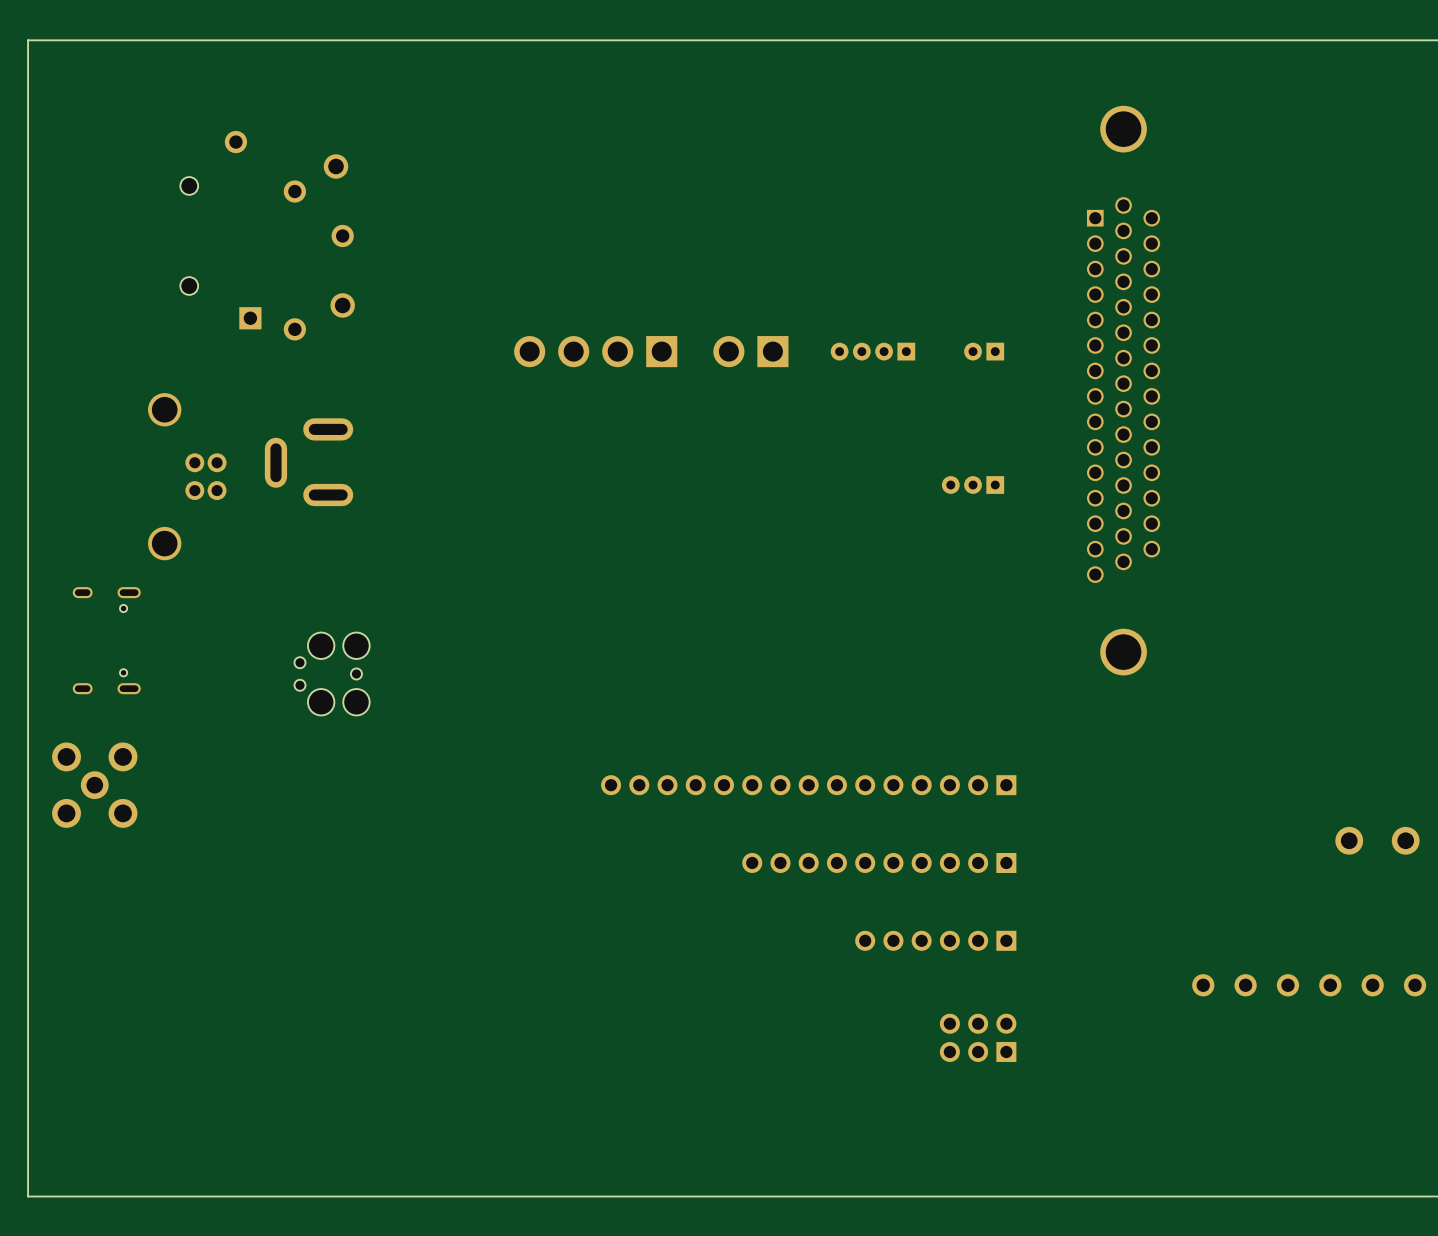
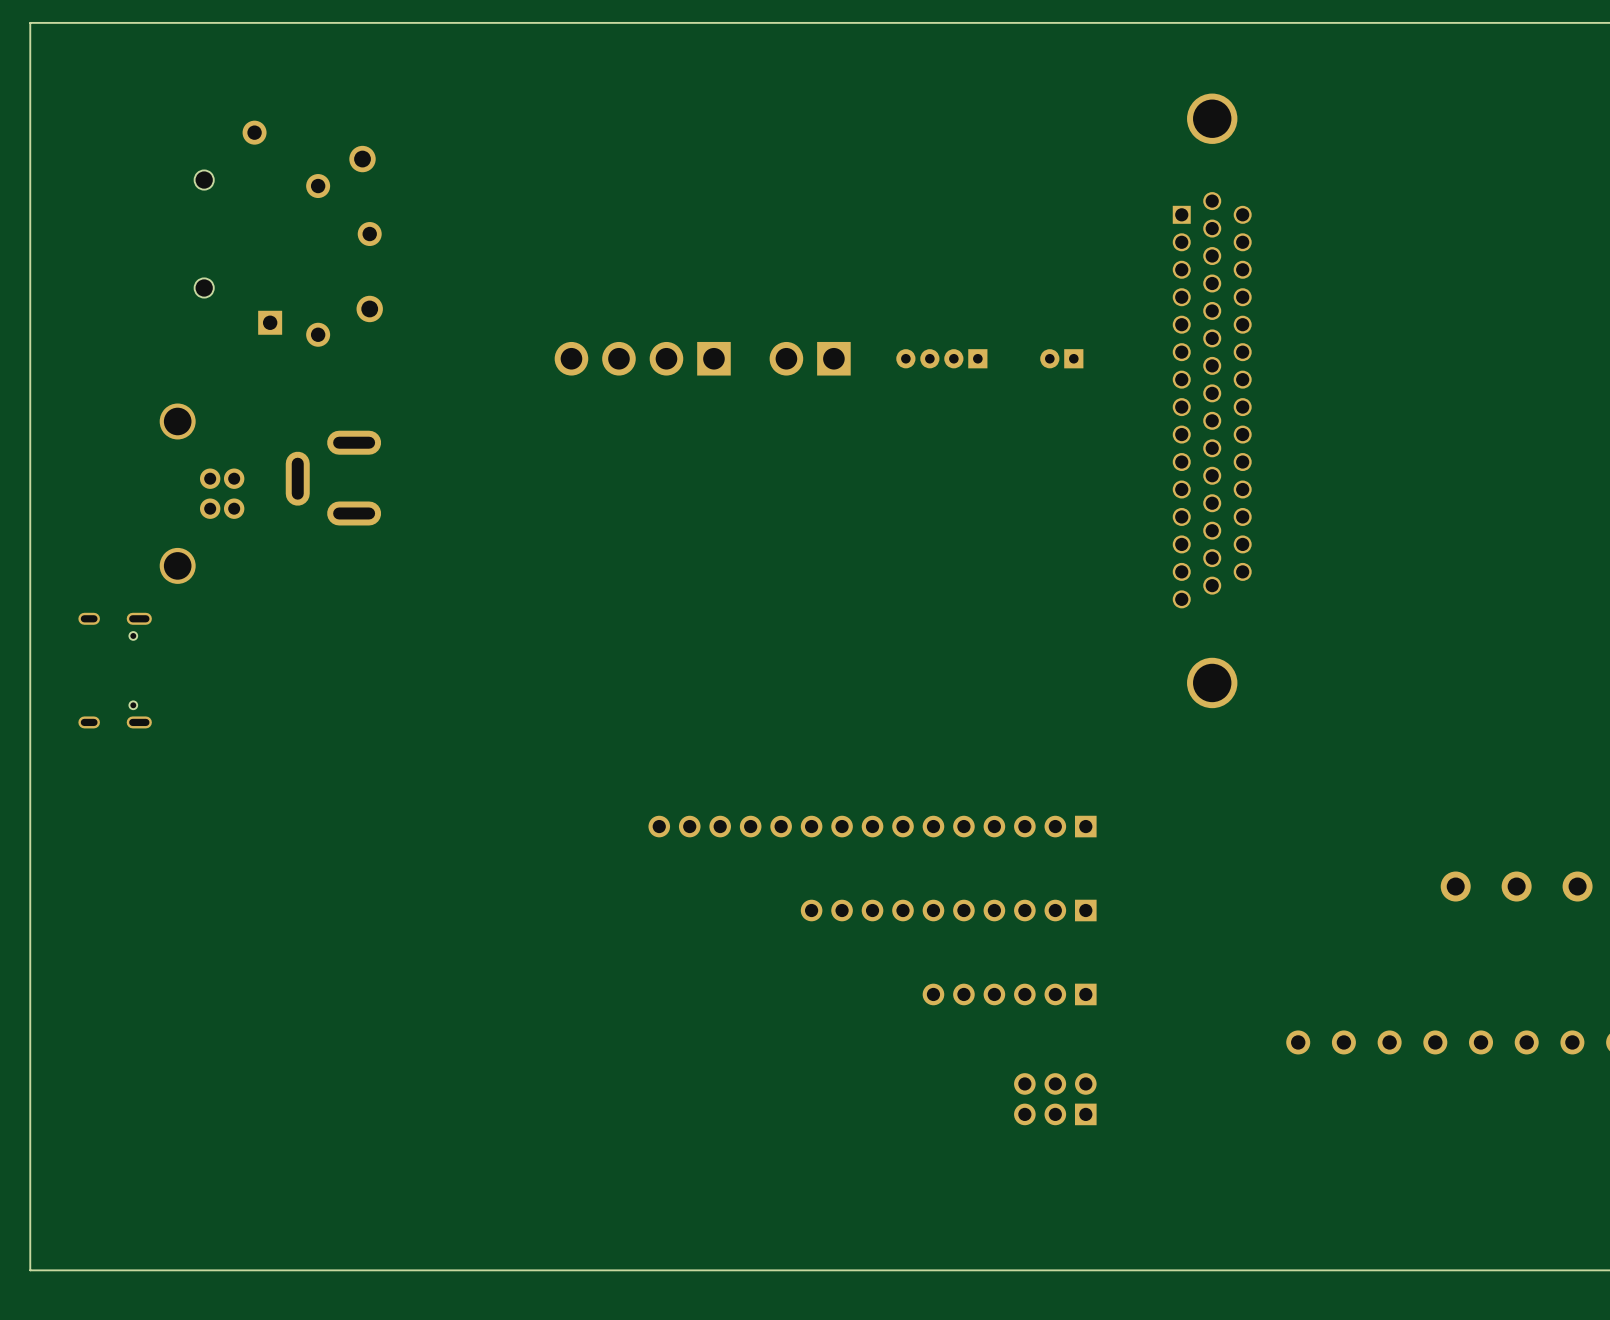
part: (973, 485) -> none
part: (332, 674) -> none
part: (94, 785) -> none

